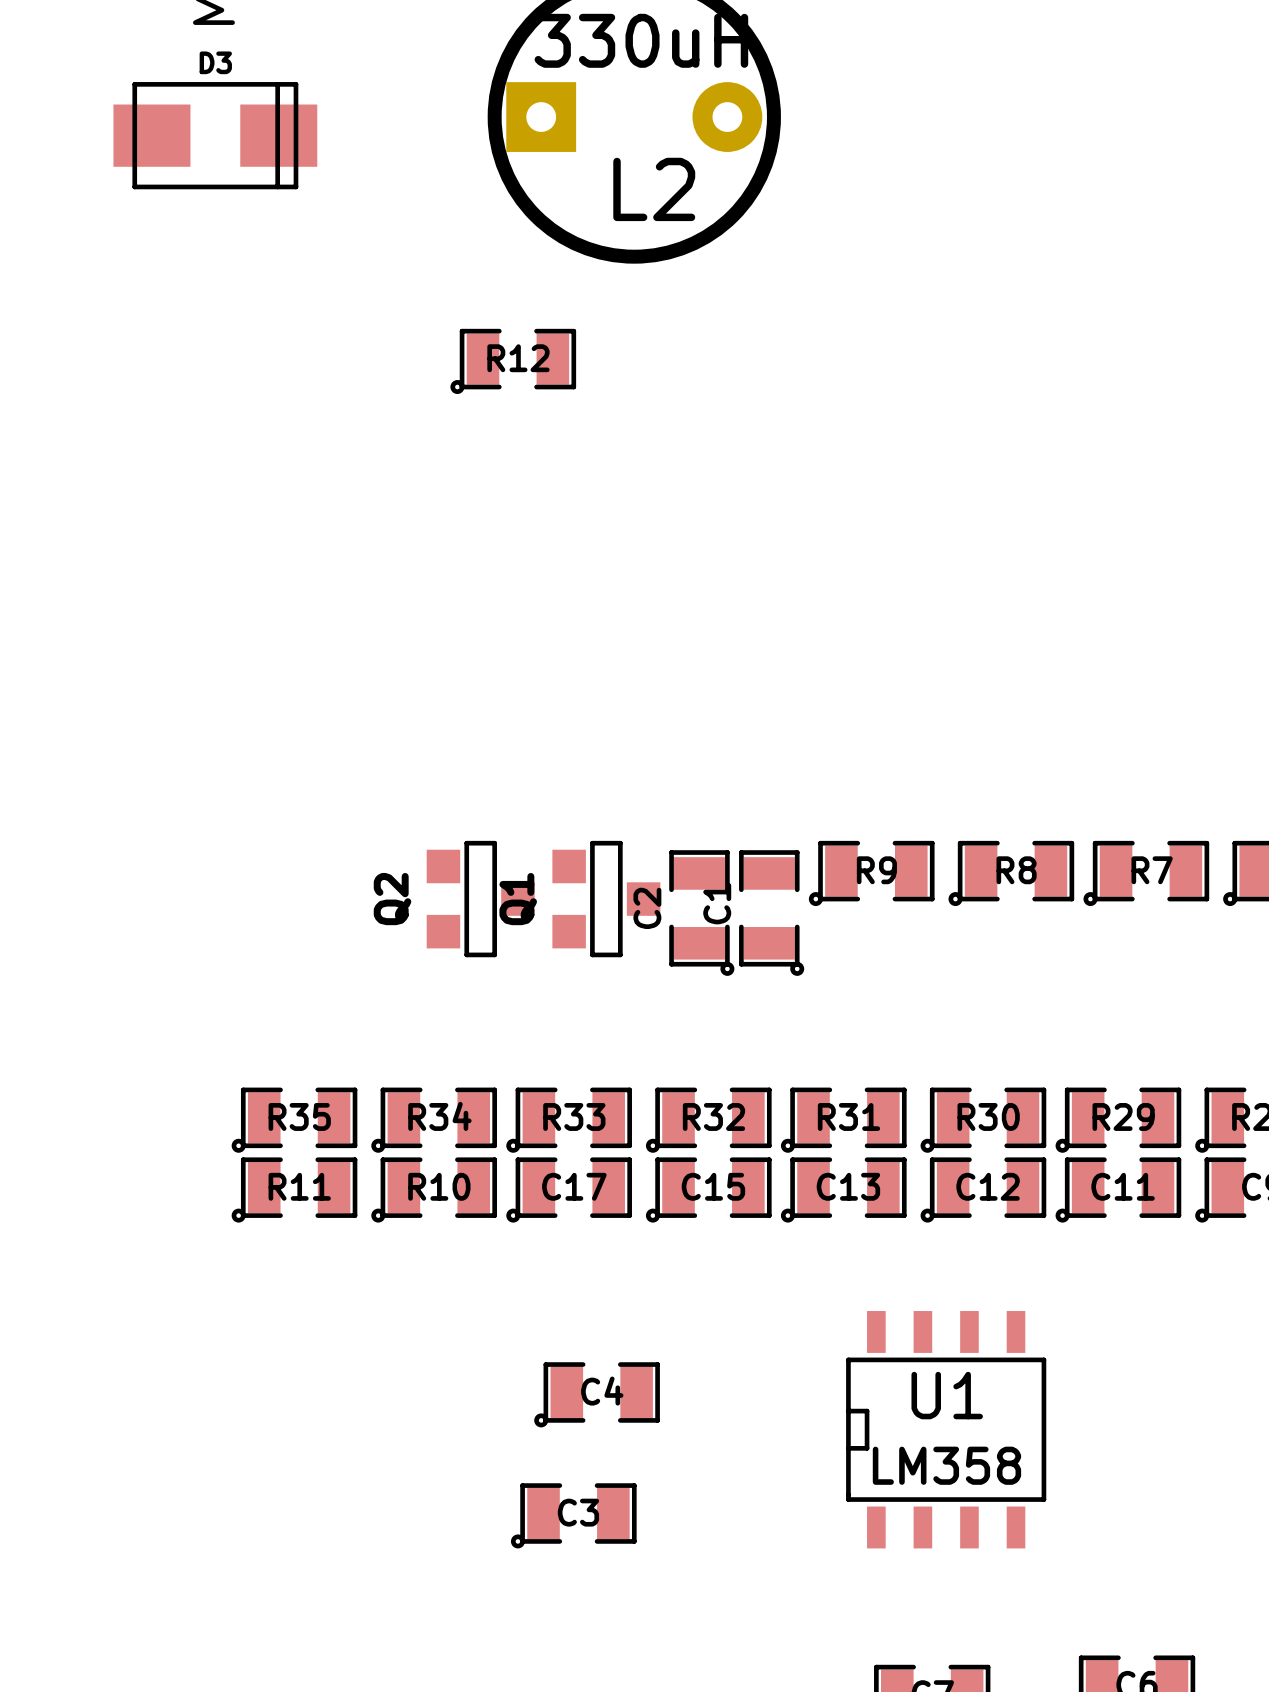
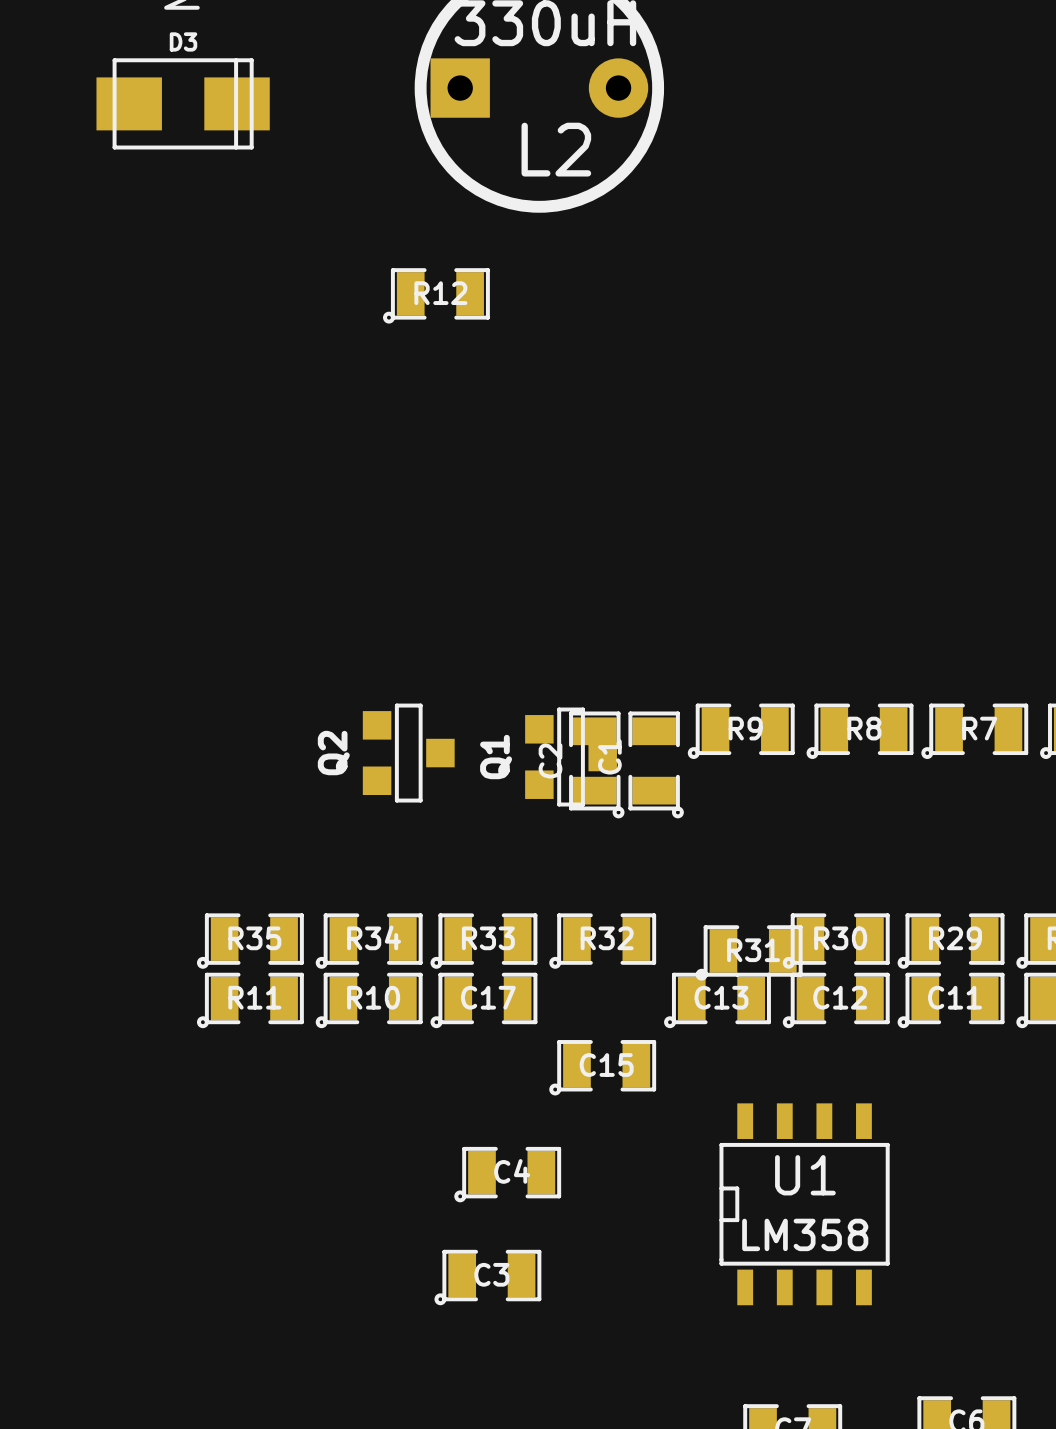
Q1 position: (606, 899) -> (571, 757)
R31 position: (843, 1120) -> (749, 952)
C15 position: (708, 1189) -> (602, 1067)

